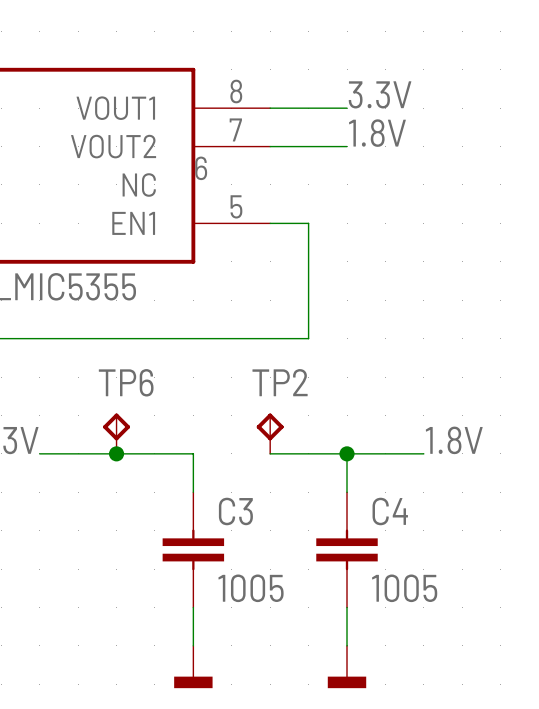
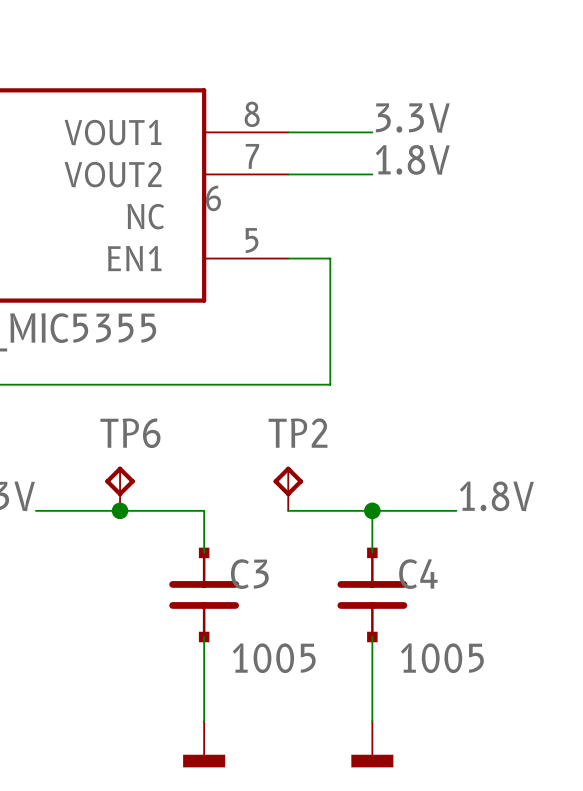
C3 symbol: [162, 492, 225, 608] -> [169, 547, 240, 643]
C4 symbol: [316, 492, 378, 608] -> [337, 547, 408, 643]

